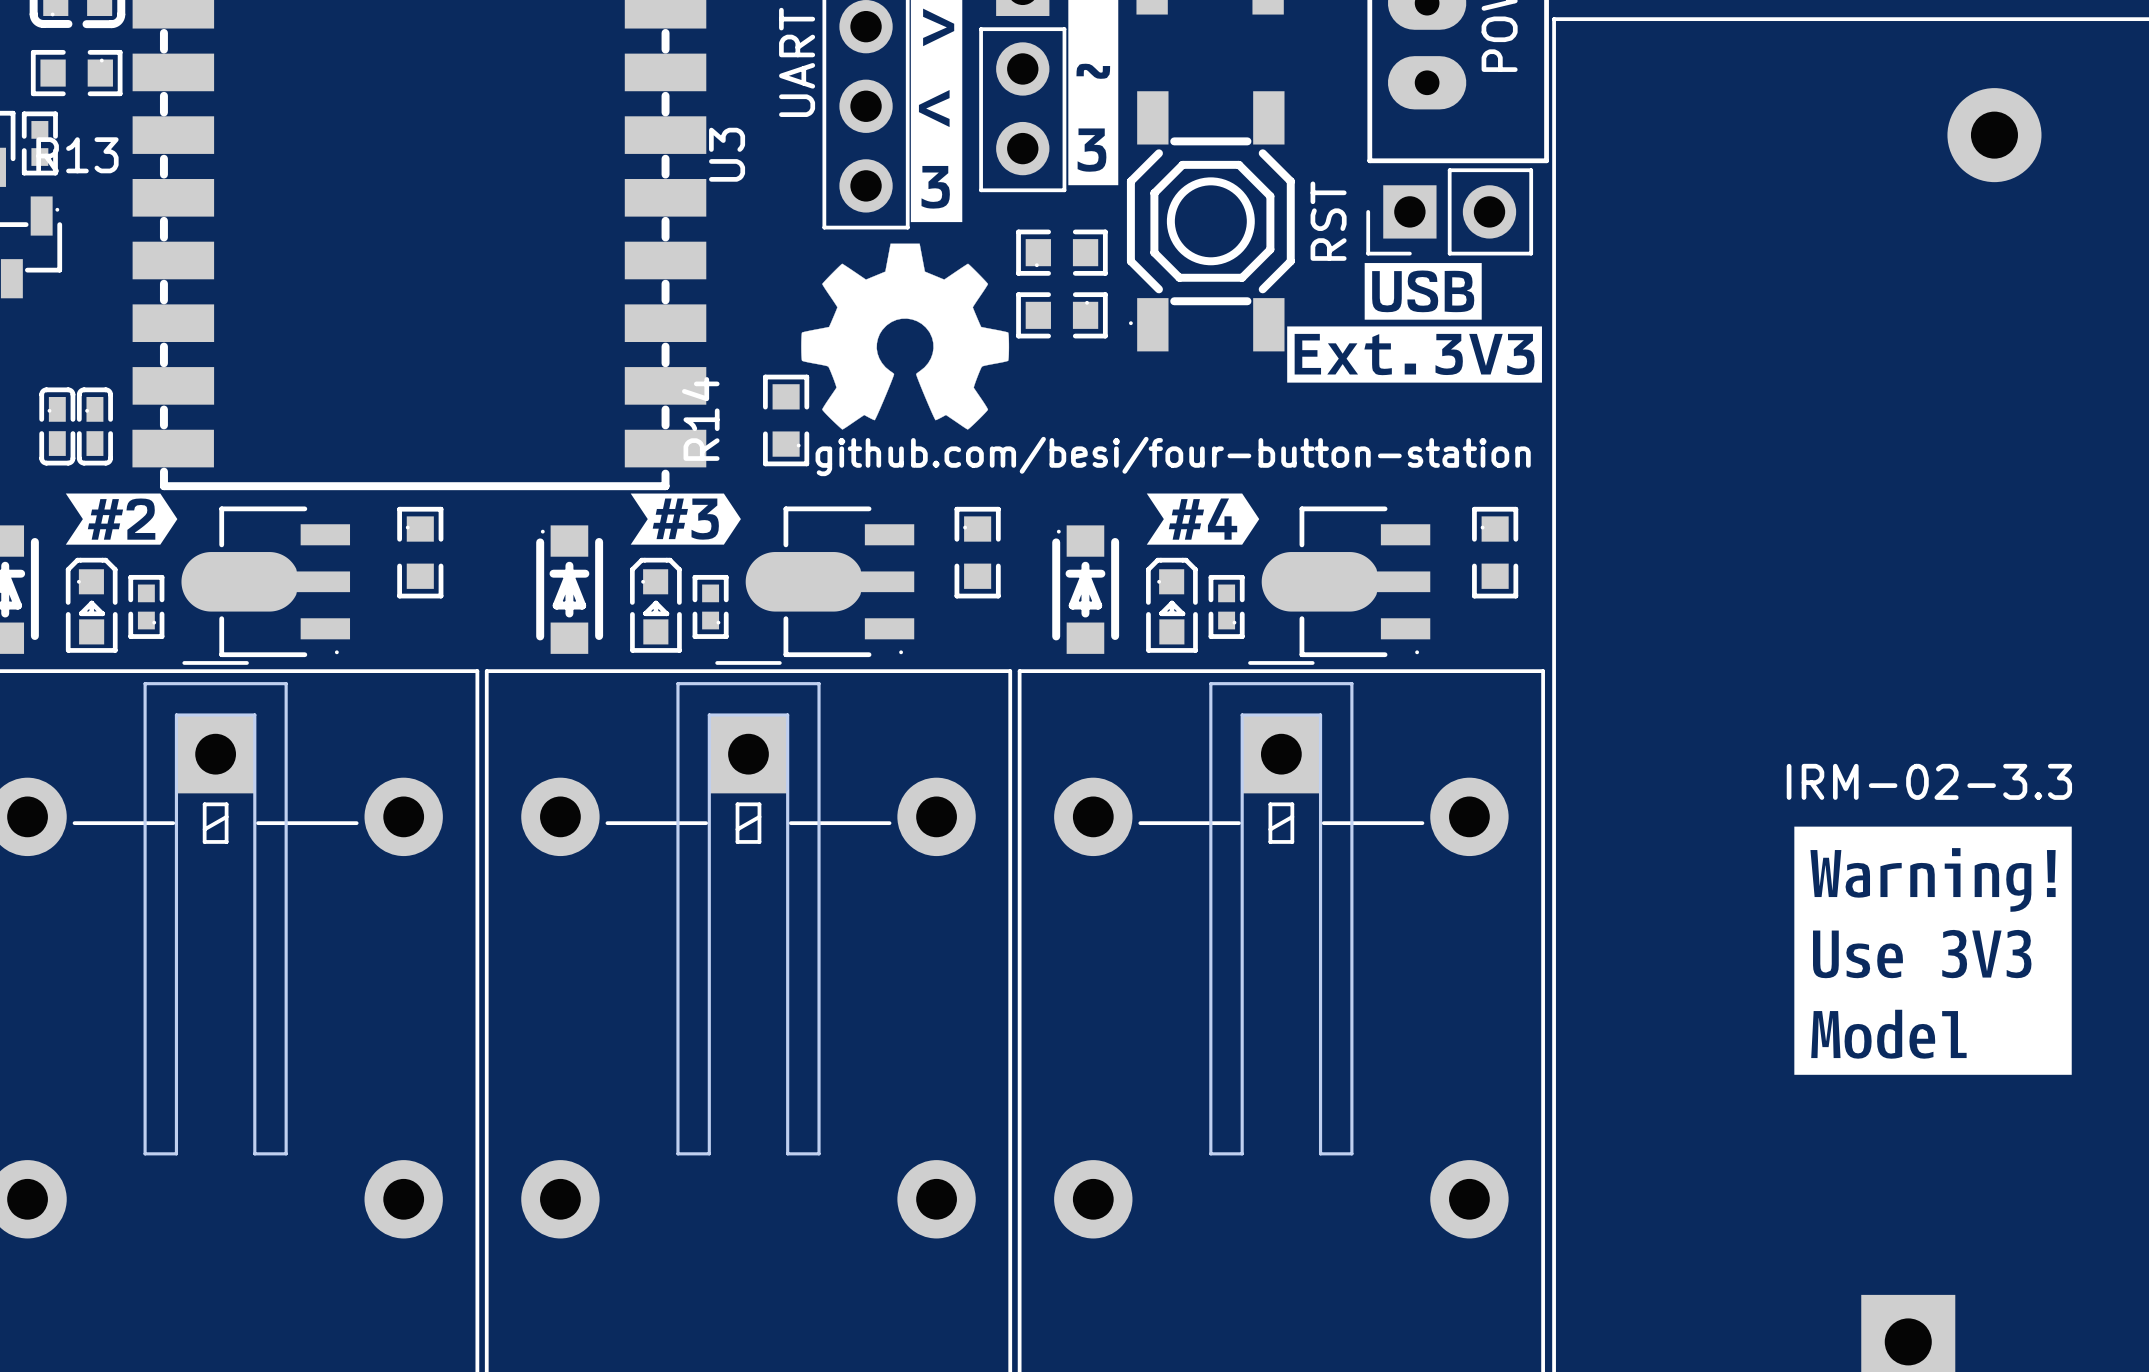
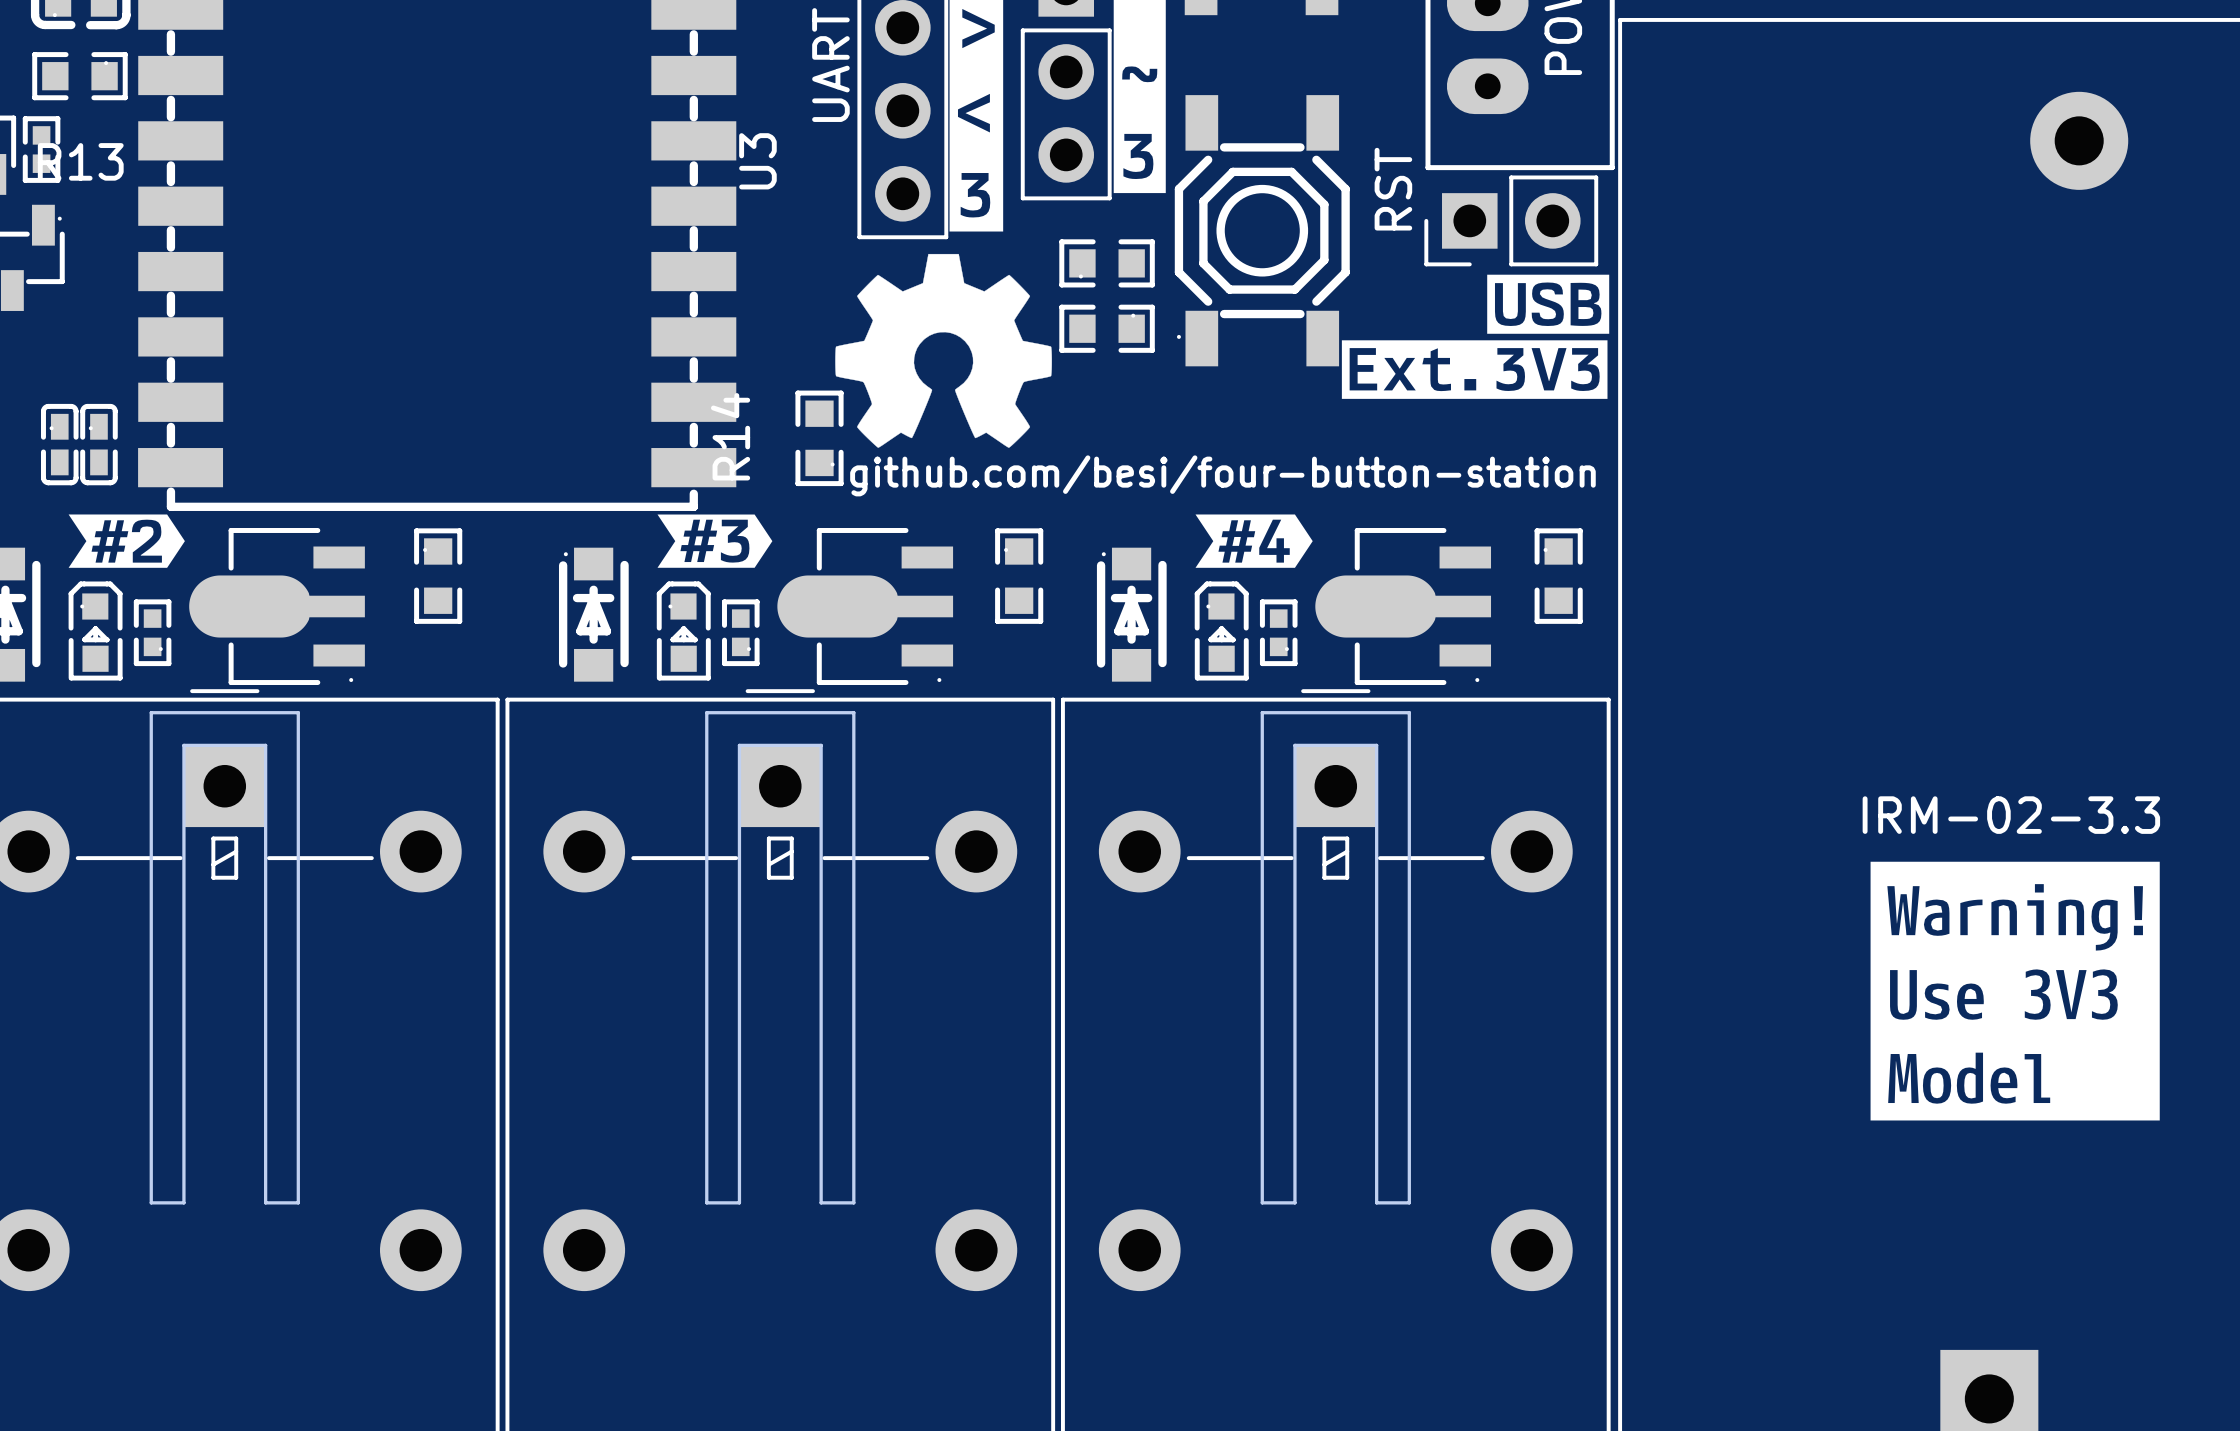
part value position: RST (1328, 221) -> RST (1393, 189)
drawing position: (1423, 291) -> (1548, 304)

